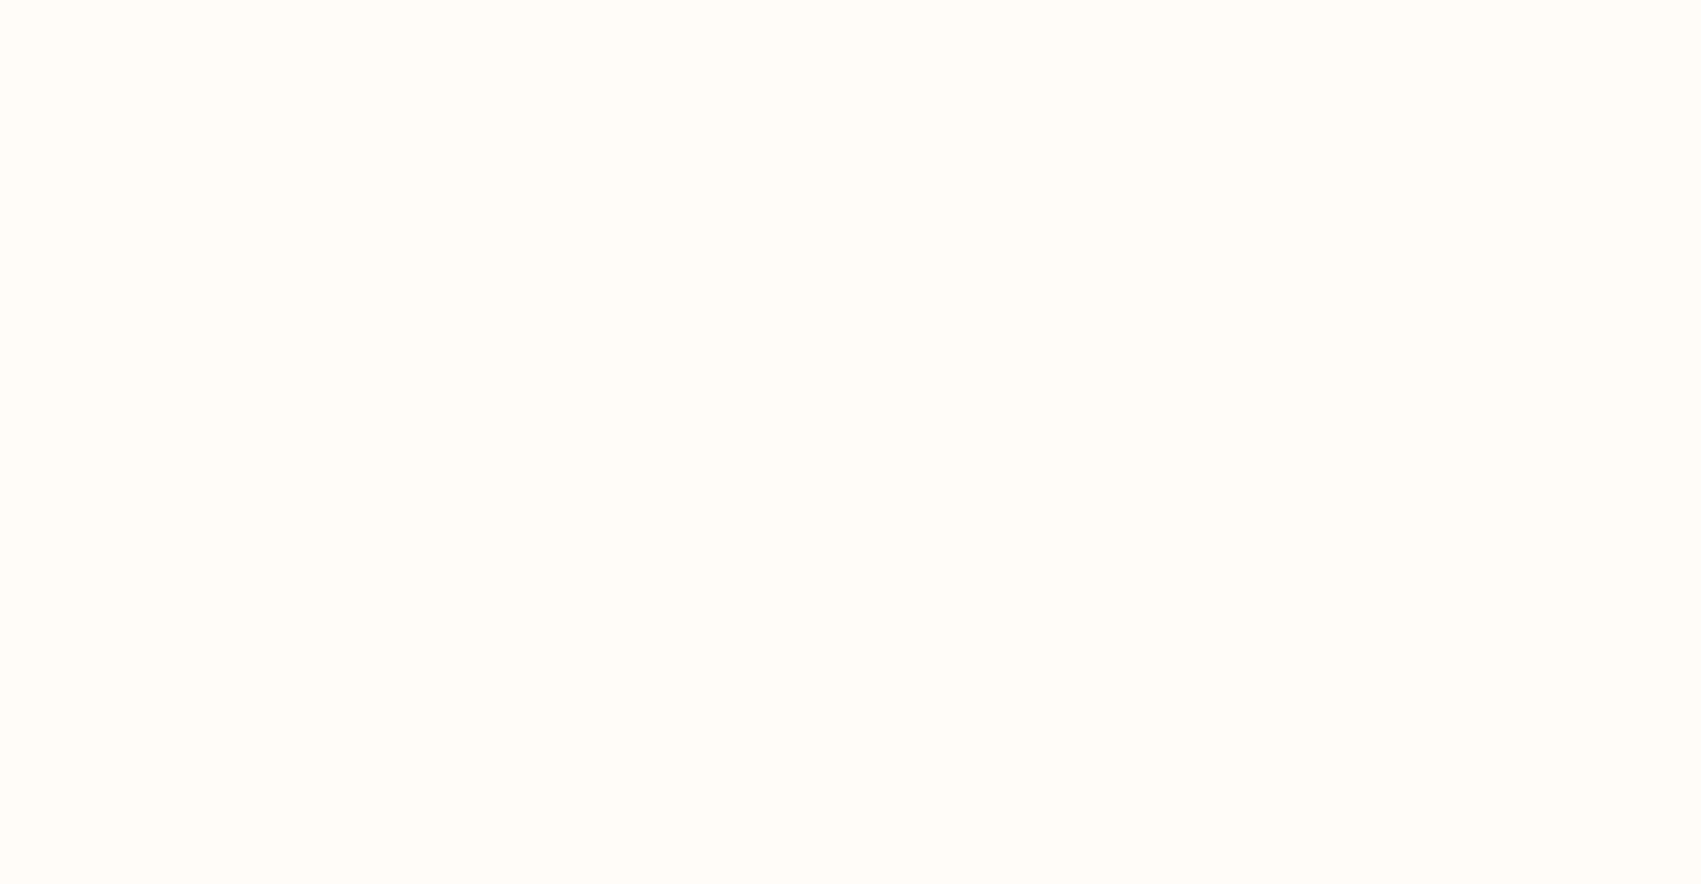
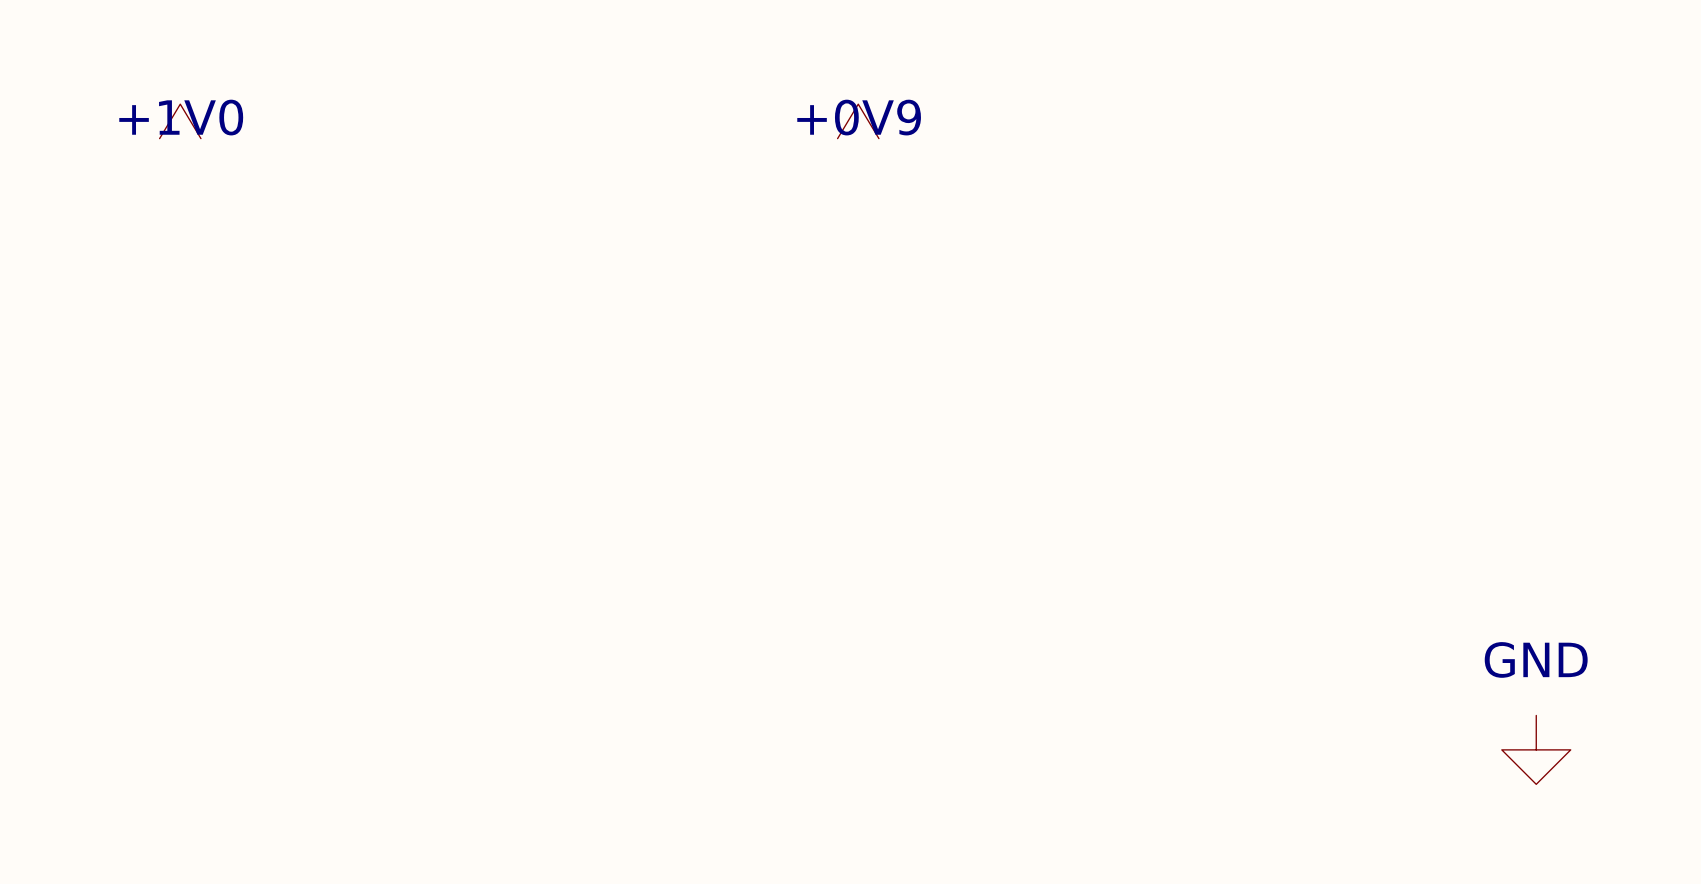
power symbol: none -> +1V0 (180, 121)
power symbol: none -> +0V9 (858, 121)
power symbol: none -> GND (1536, 749)

